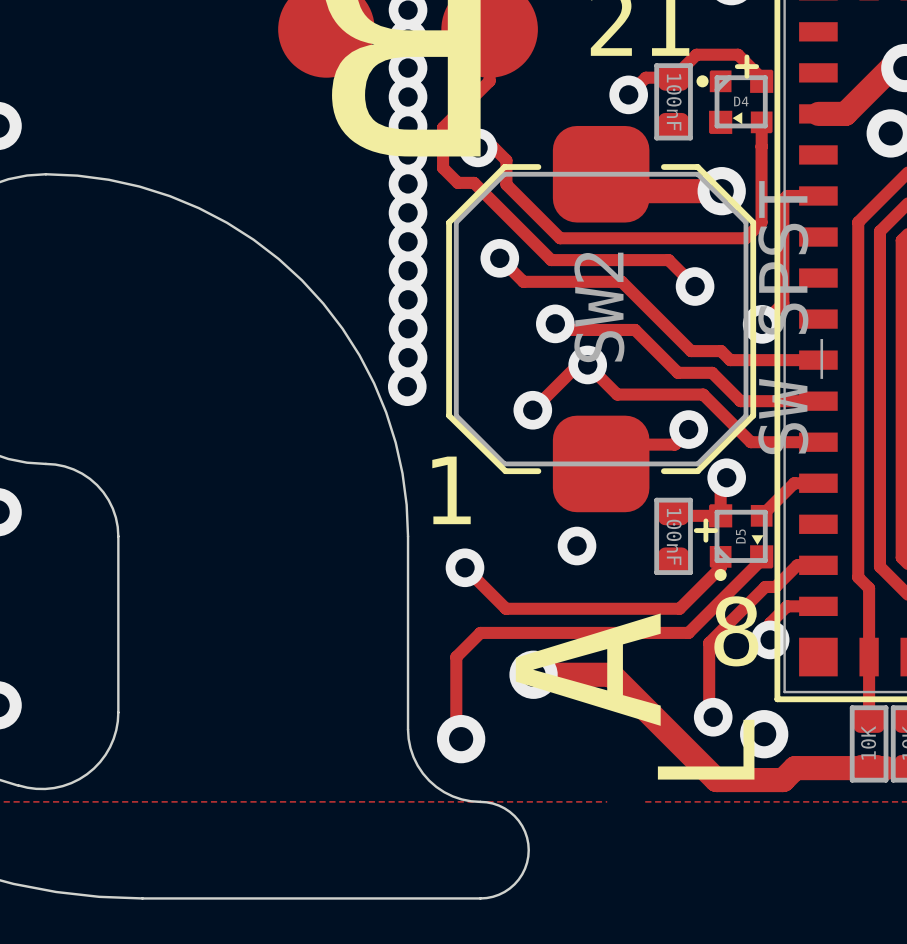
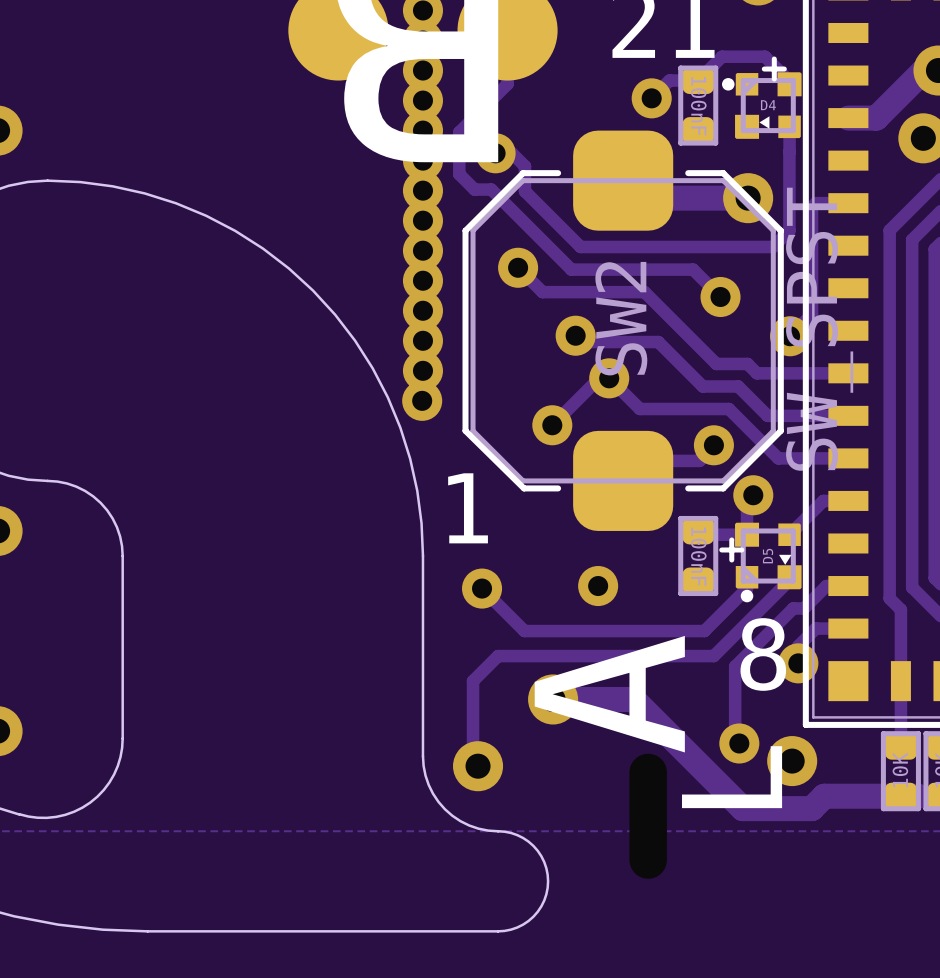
via position: (577, 546) -> (598, 586)

